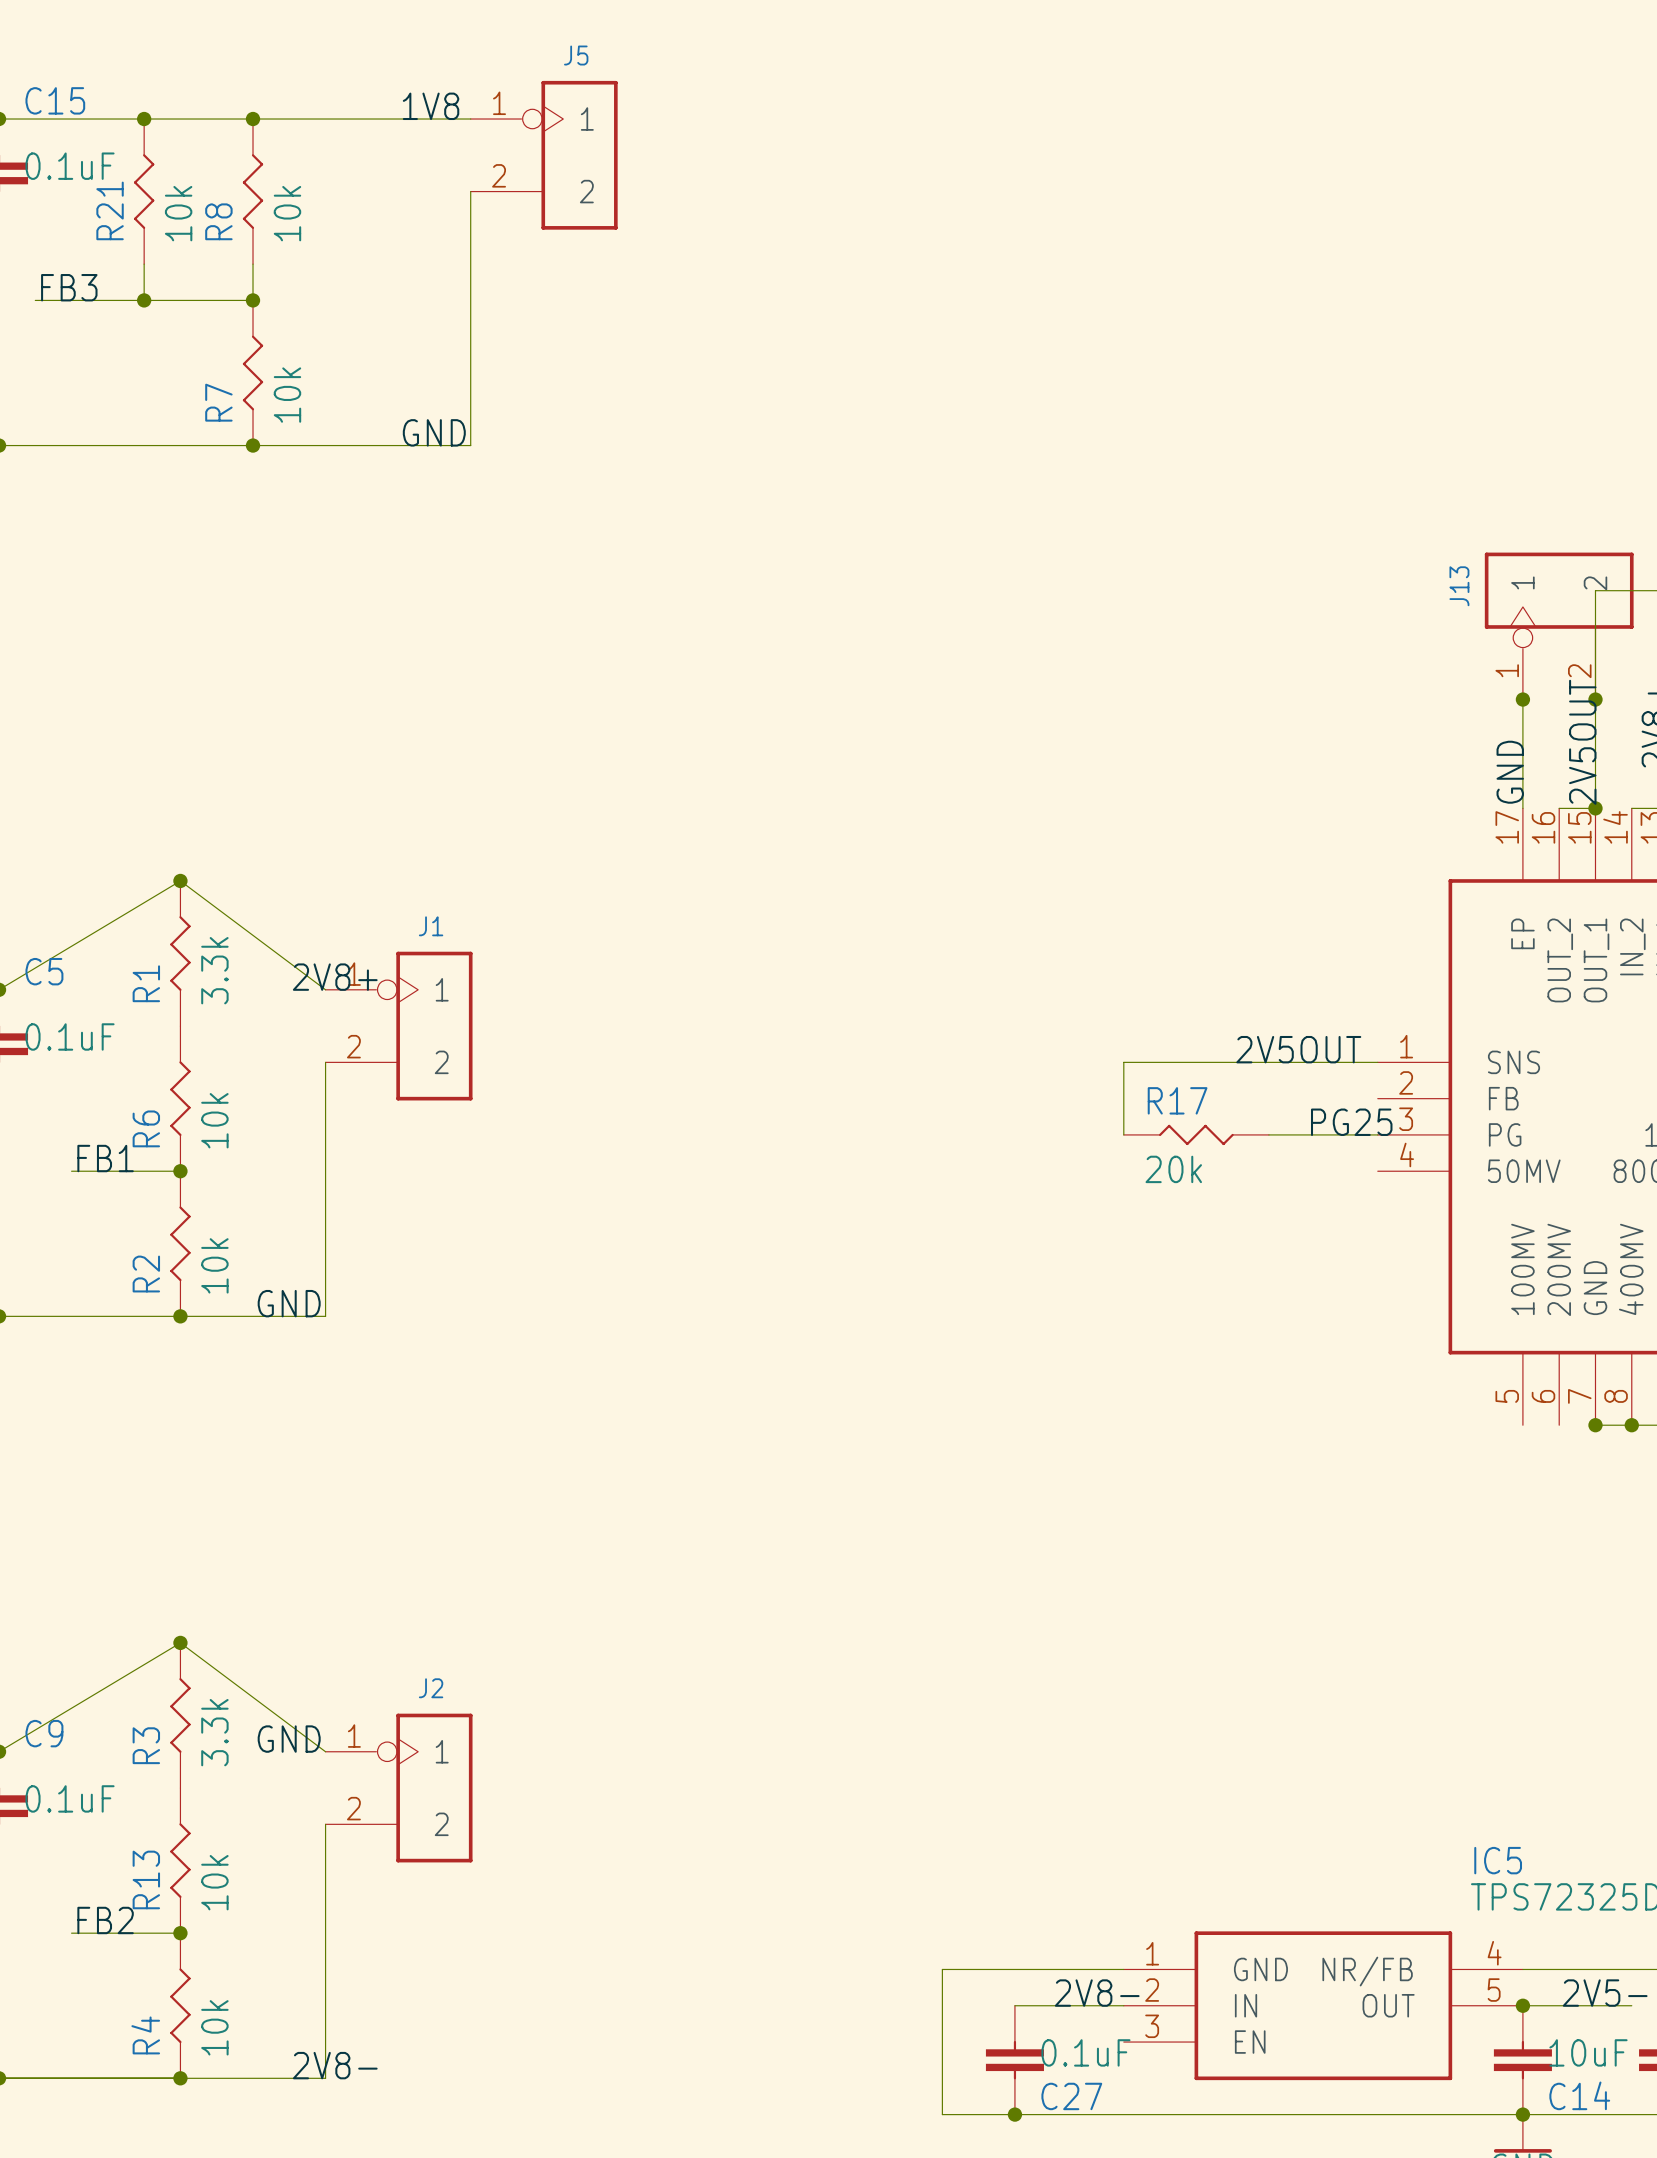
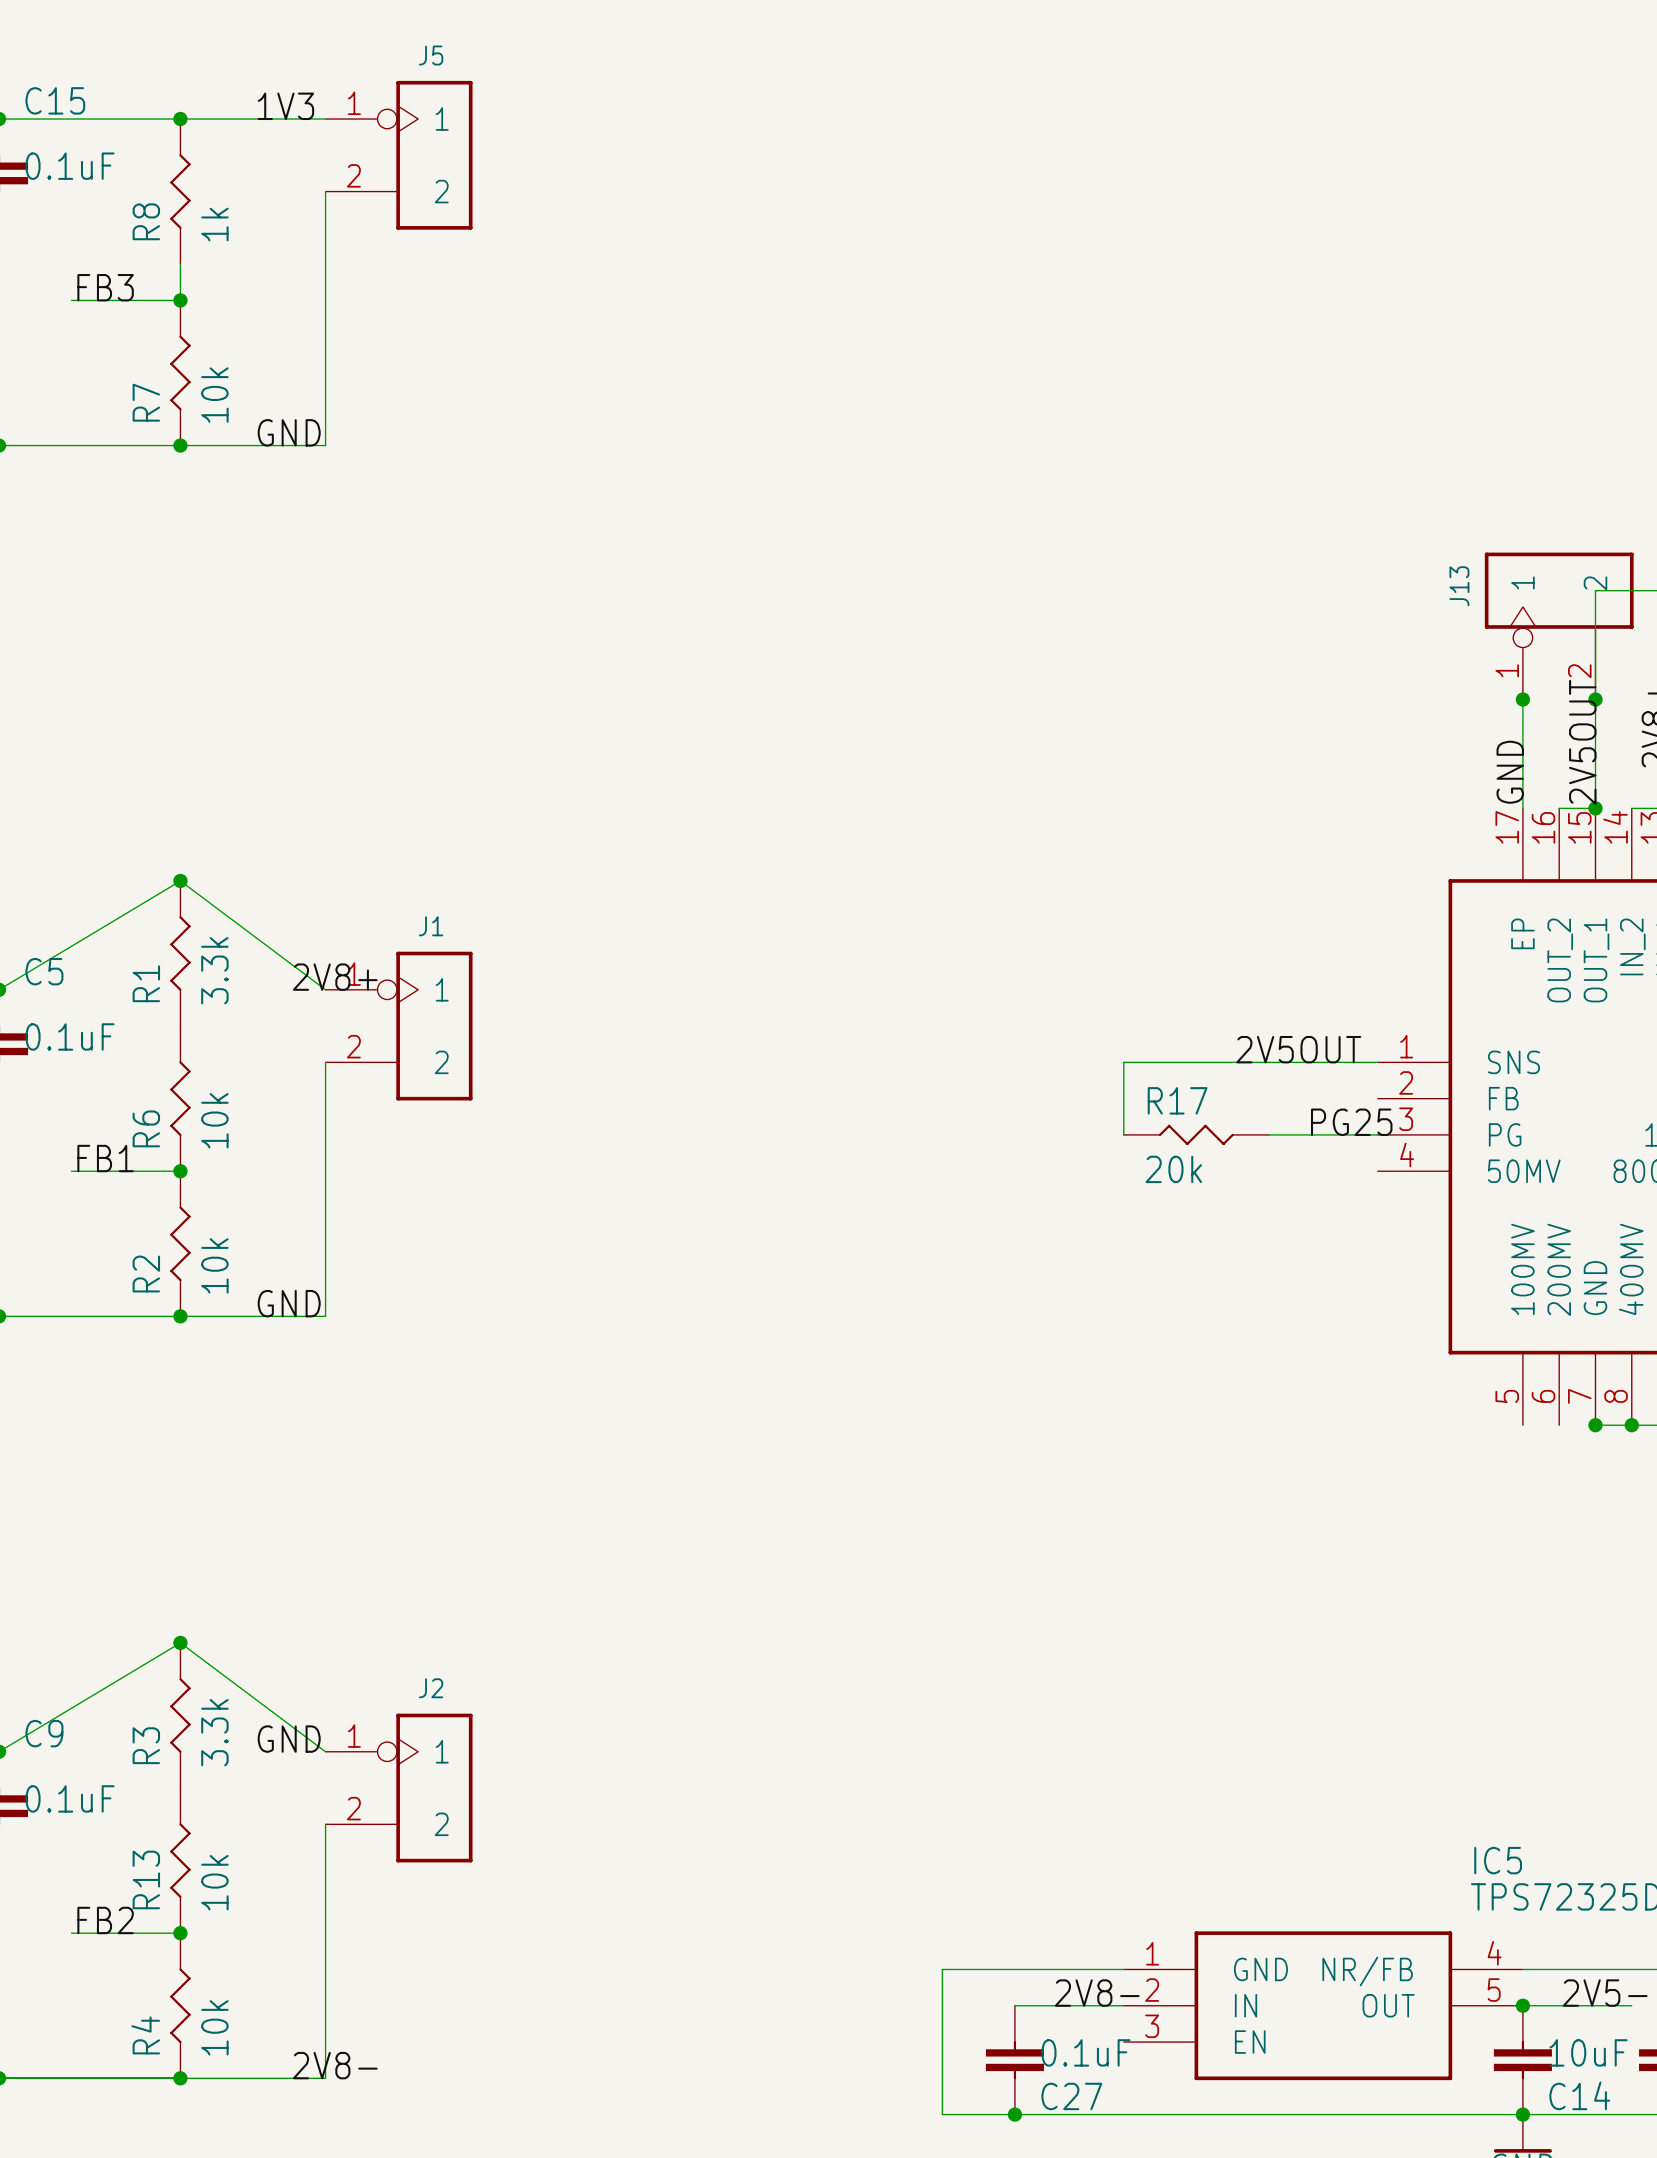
label: none -> 1V3 (285, 106)
label: 1V8 (431, 106) -> none
junction: (144, 119) -> none
junction: none -> (180, 119)
junction: (253, 119) -> none
wire: (325, 119) (470, 119) -> none
J5 position: (544, 155) -> (399, 155)
R21: 10k (144, 191) -> none
R8 position: (253, 191) -> (180, 191)
wire: (470, 191) (470, 445) (325, 445) -> (325, 191) (325, 445)
R8 value: 10k (287, 213) -> 1k (214, 224)
wire: (144, 264) (144, 300) -> none
wire: (253, 264) (253, 300) (180, 300) -> (180, 264) (180, 300)
label position: FB3 (69, 287) -> FB3 (105, 287)
wire: (35, 300) (71, 300) -> none
junction: (144, 300) -> none
junction: none -> (180, 300)
junction: (253, 300) -> none
R7 position: (253, 372) -> (180, 372)
label position: GND (434, 432) -> GND (289, 432)
junction position: (253, 445) -> (180, 445)

